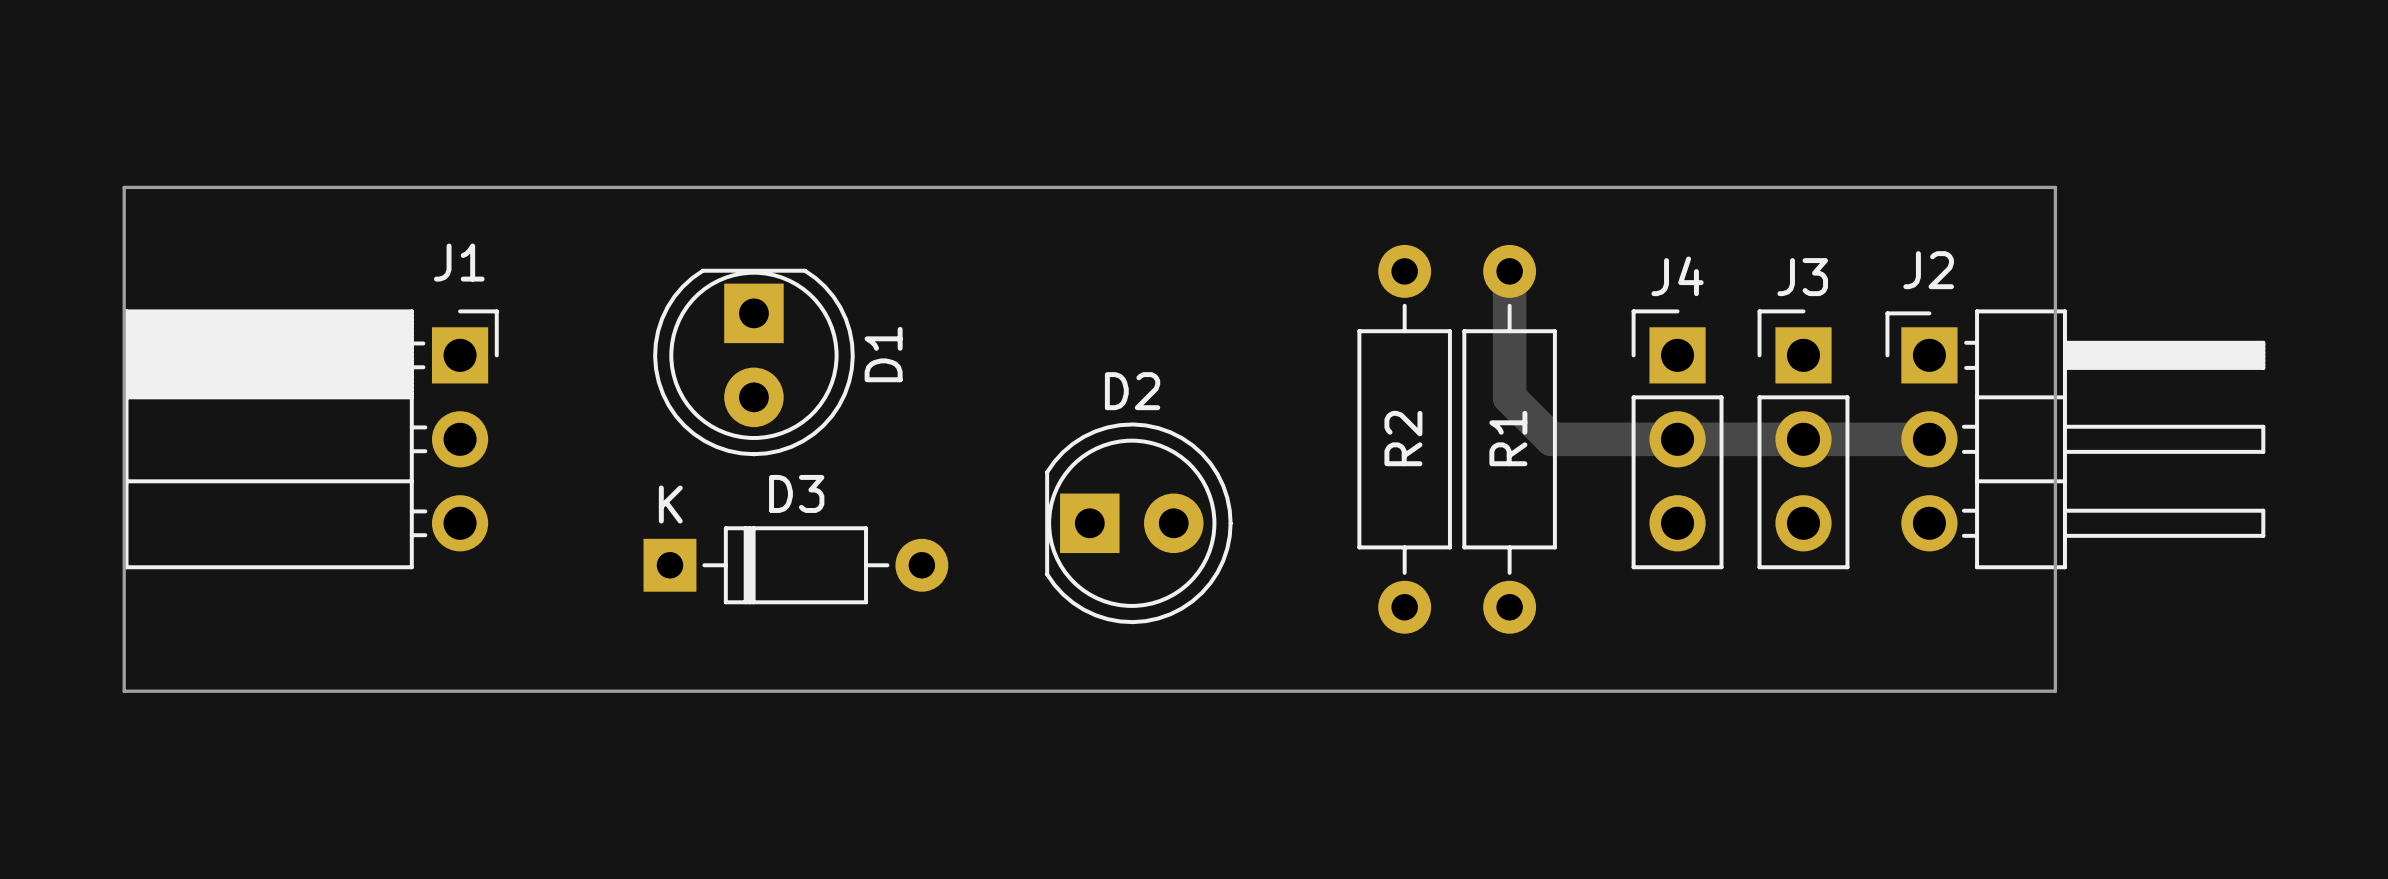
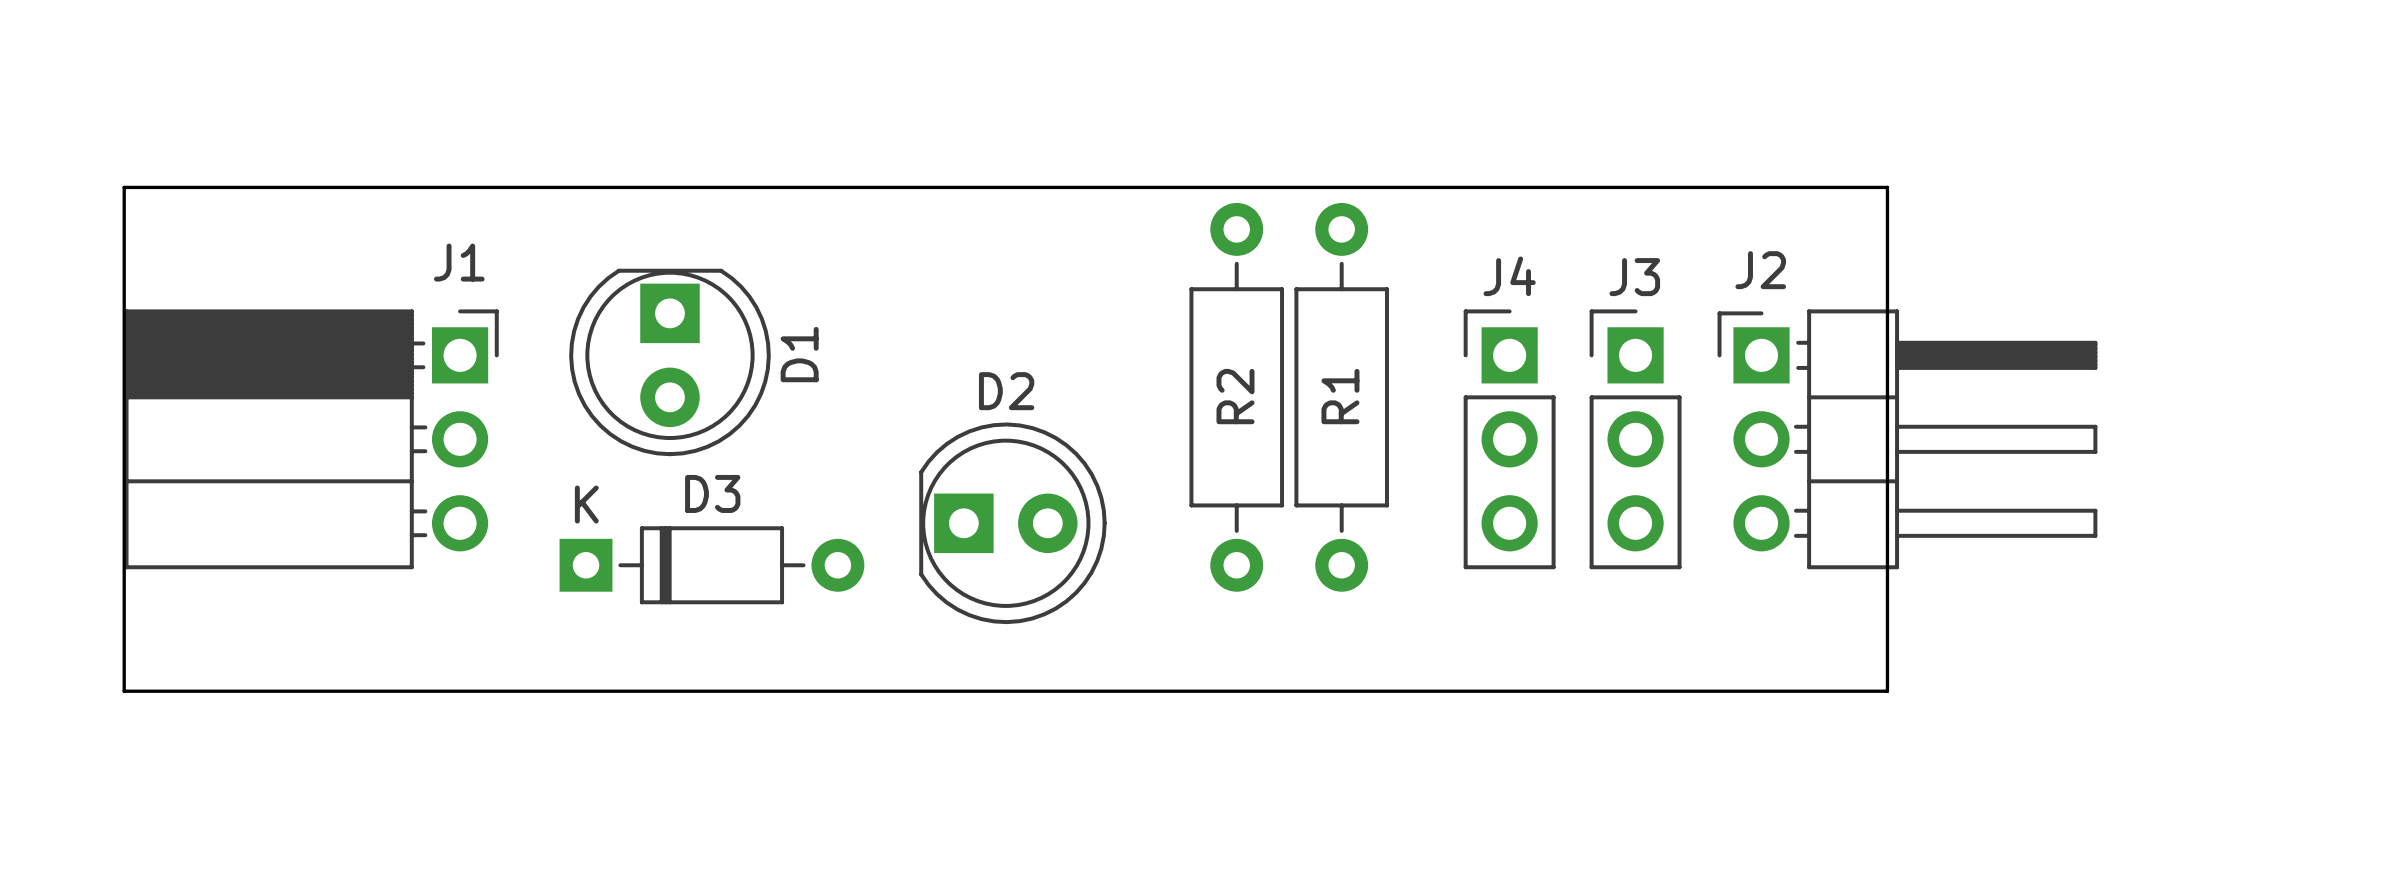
board edge: (1887, 187) (2055, 187) (2055, 691) (1887, 691) -> (1887, 187) (1887, 691)
track: (1509, 271) (1509, 397) (1551, 439) (1929, 439) -> none
D1 position: (753, 362) -> (669, 362)
R2 position: (1404, 439) -> (1236, 397)
R1 position: (1509, 439) -> (1341, 397)
J4 position: (1677, 439) -> (1509, 439)
J3 position: (1803, 439) -> (1635, 439)
J2 position: (2075, 439) -> (1907, 439)
D2 position: (1138, 523) -> (1012, 523)
D3 position: (795, 565) -> (711, 565)

